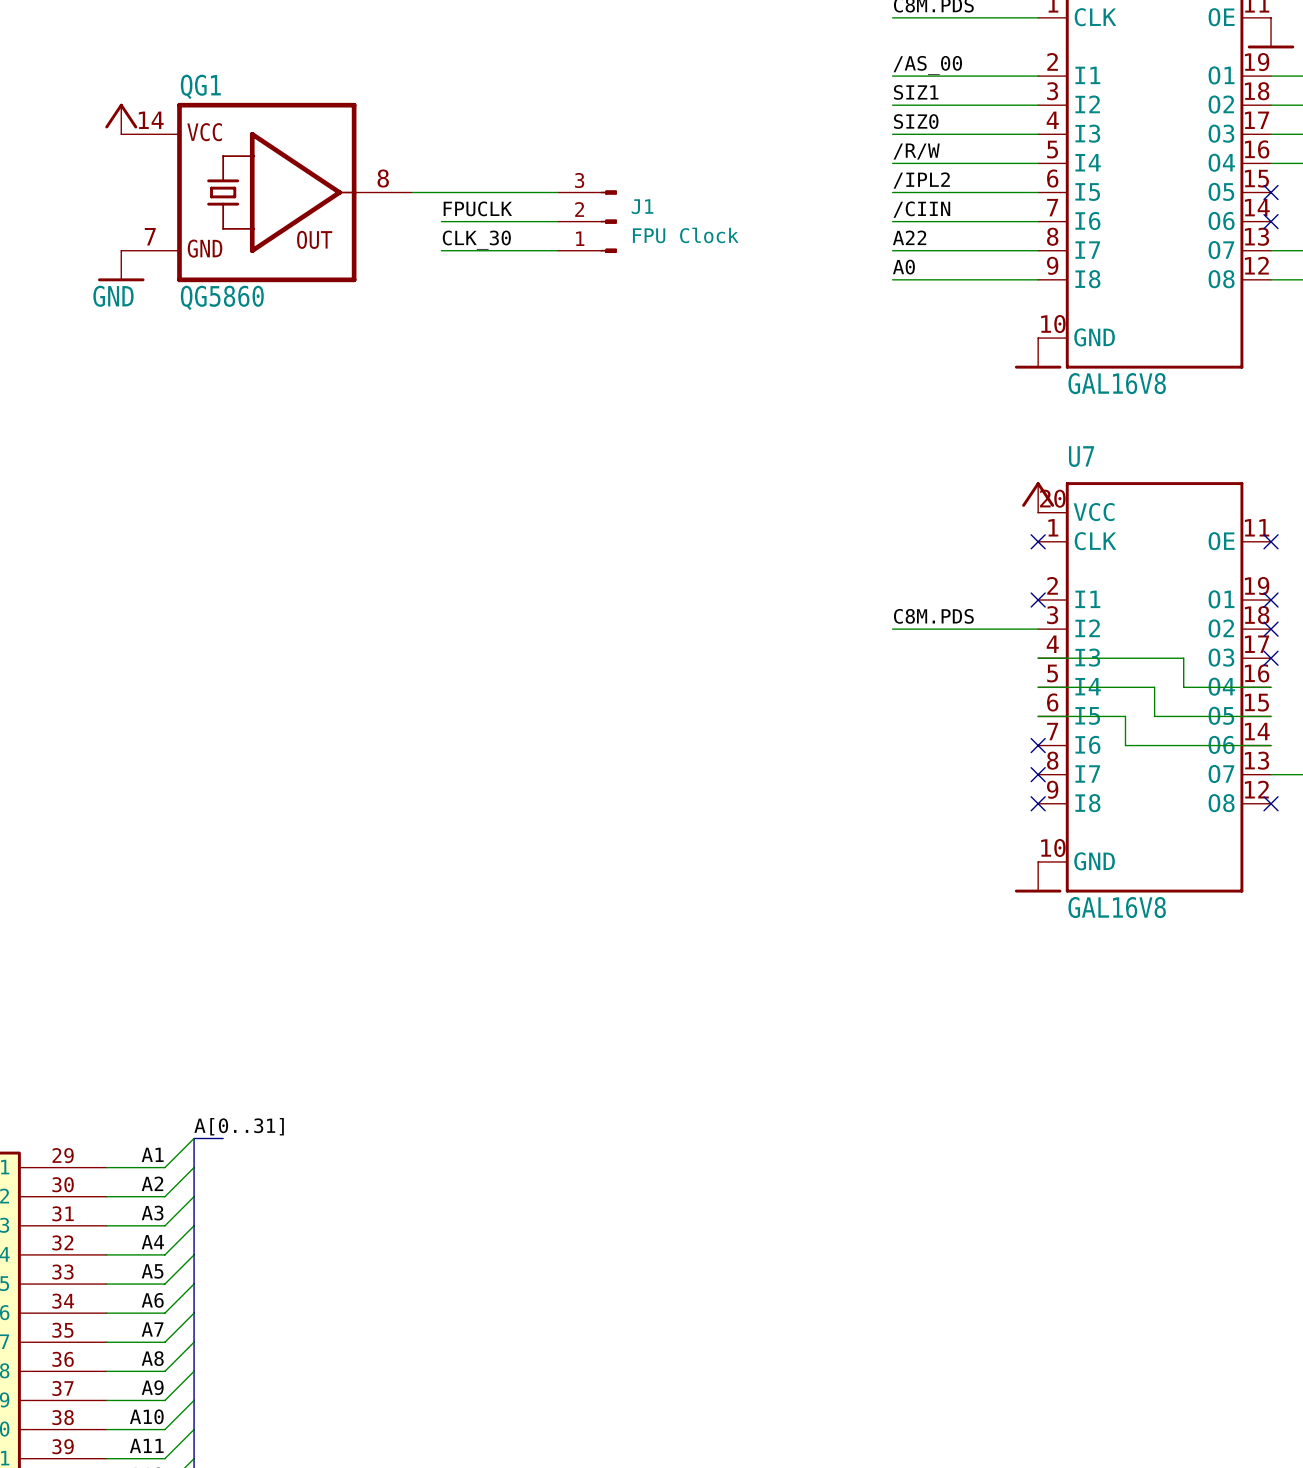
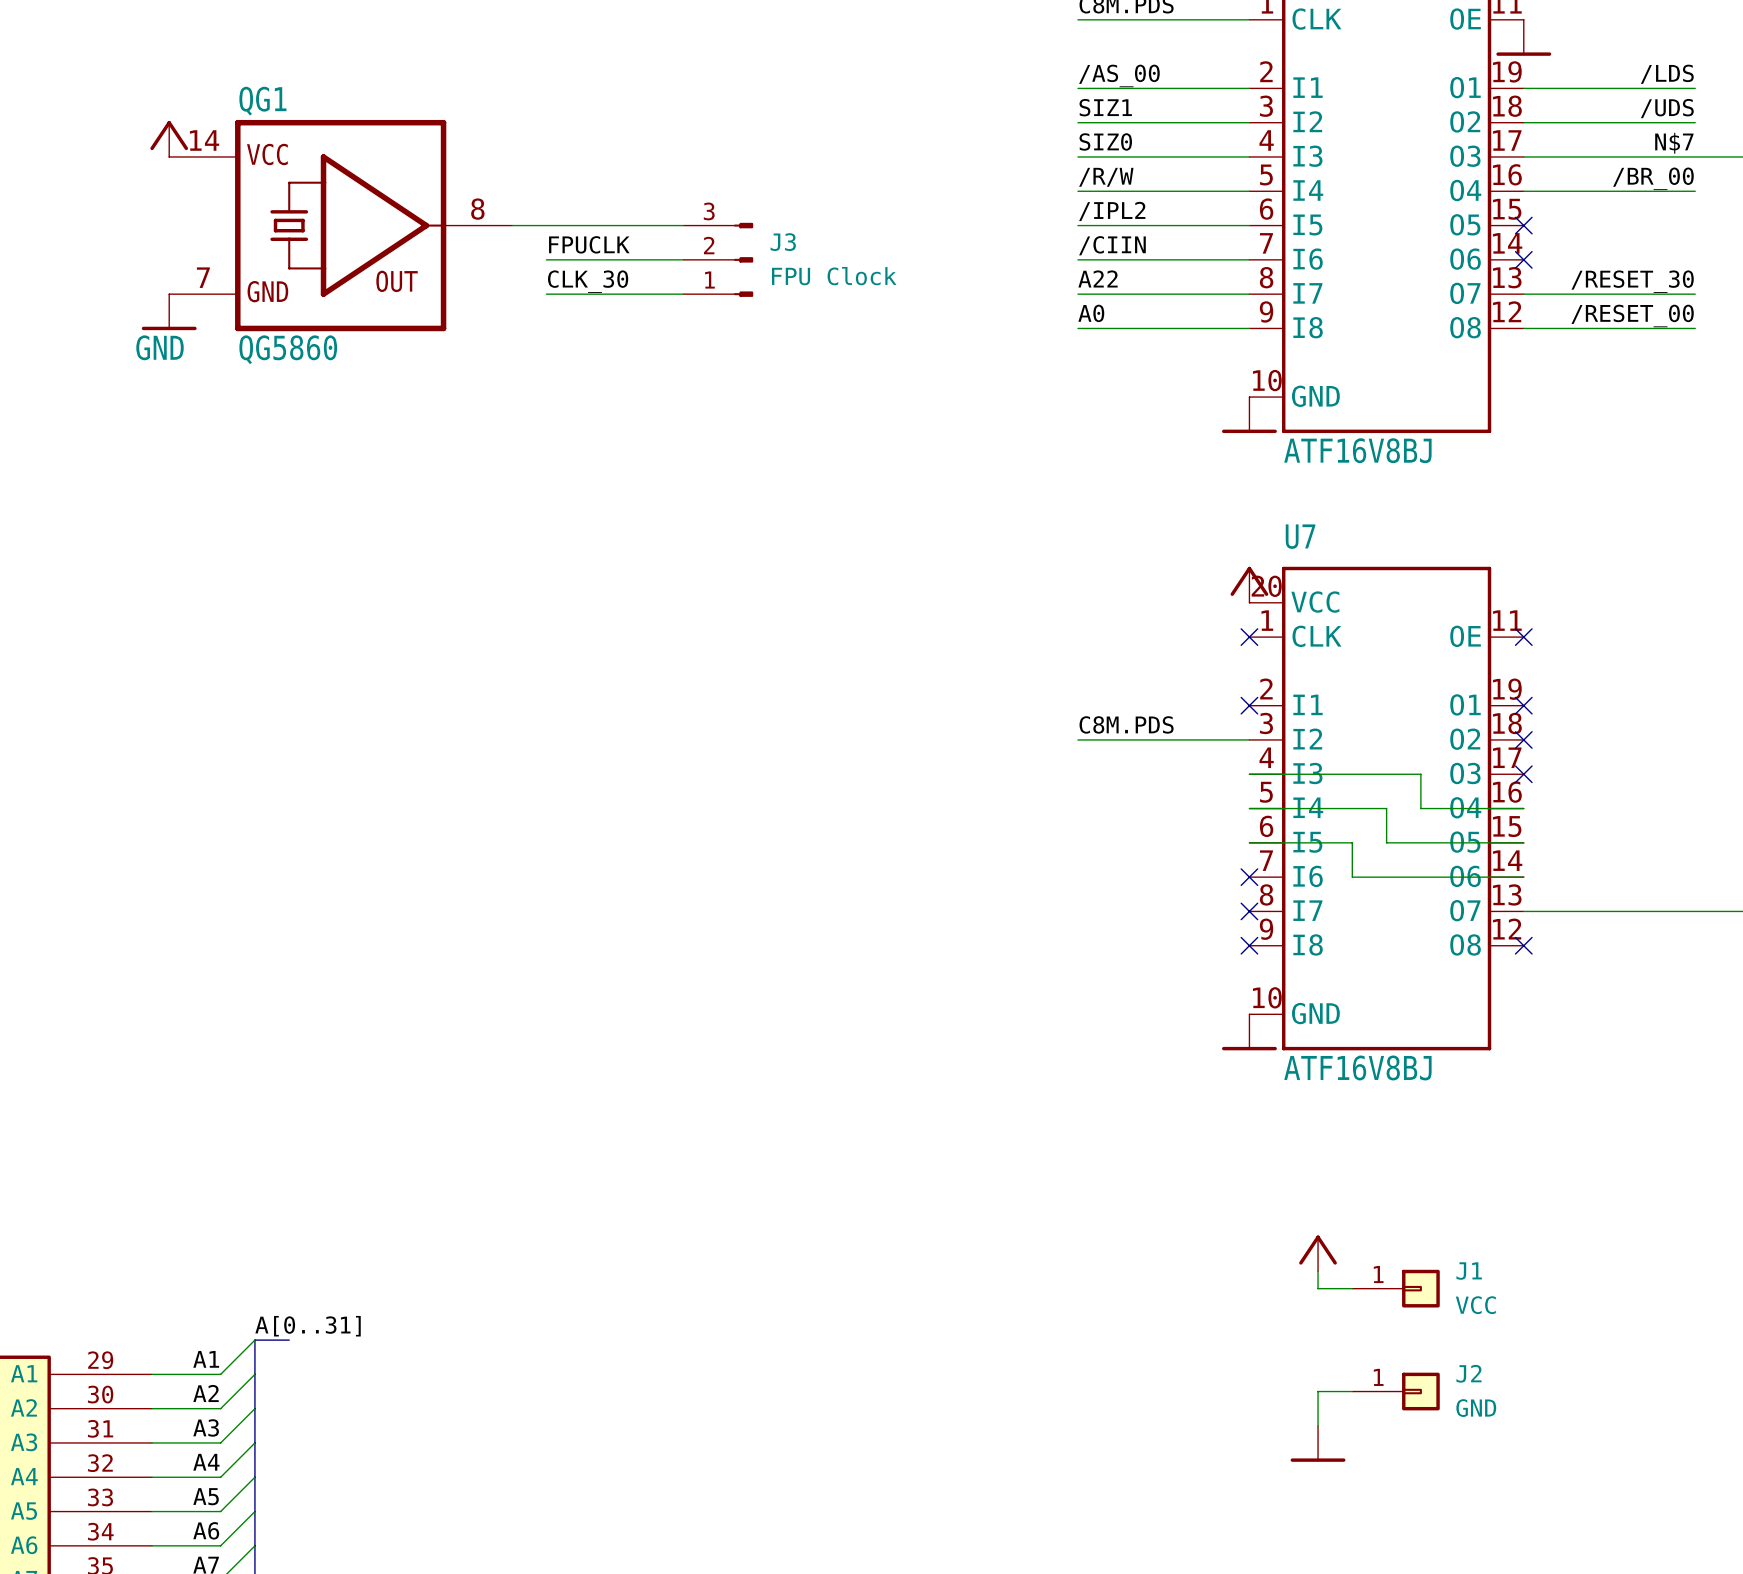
J1 name: J1 (642, 206) -> J3 (783, 242)
part value: GAL16V8 (1117, 383) -> ATF16V8BJ (1357, 450)
U7 value: GAL16V8 (1117, 907) -> ATF16V8BJ (1357, 1067)
power symbol: none -> (1318, 1253)
wire: none -> (1318, 1271) (1318, 1288) (1352, 1288)
J1: none -> VCC (1396, 1288)
wire: none -> (1352, 1391) (1318, 1391) (1318, 1425)
J2: none -> GND (1396, 1391)
power symbol: none -> (1318, 1443)

